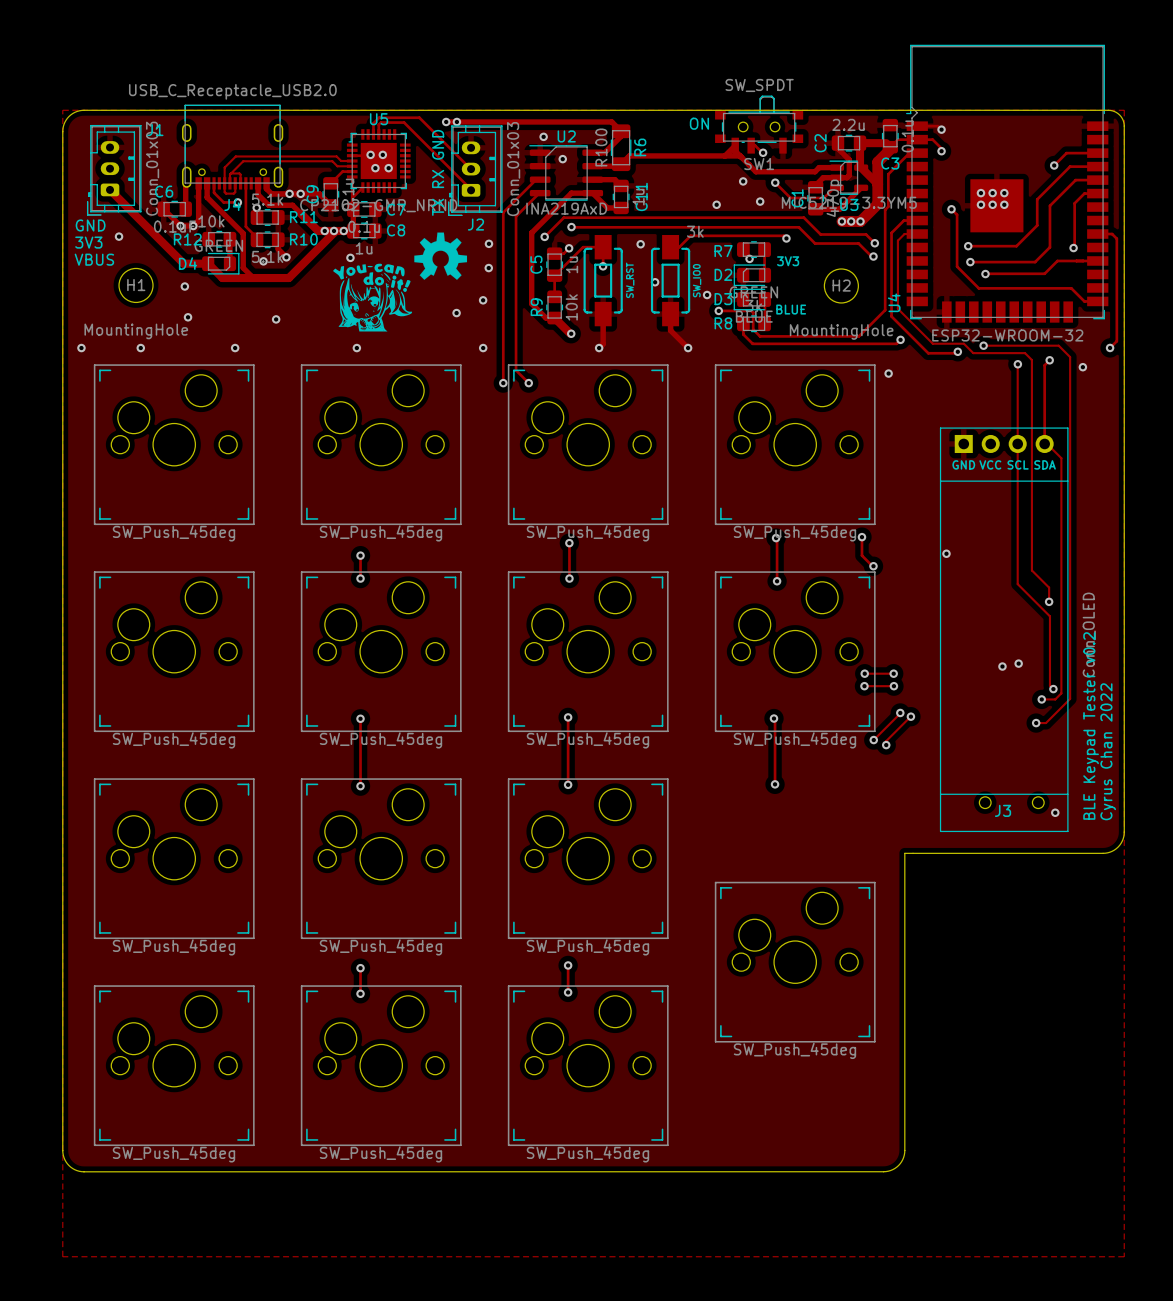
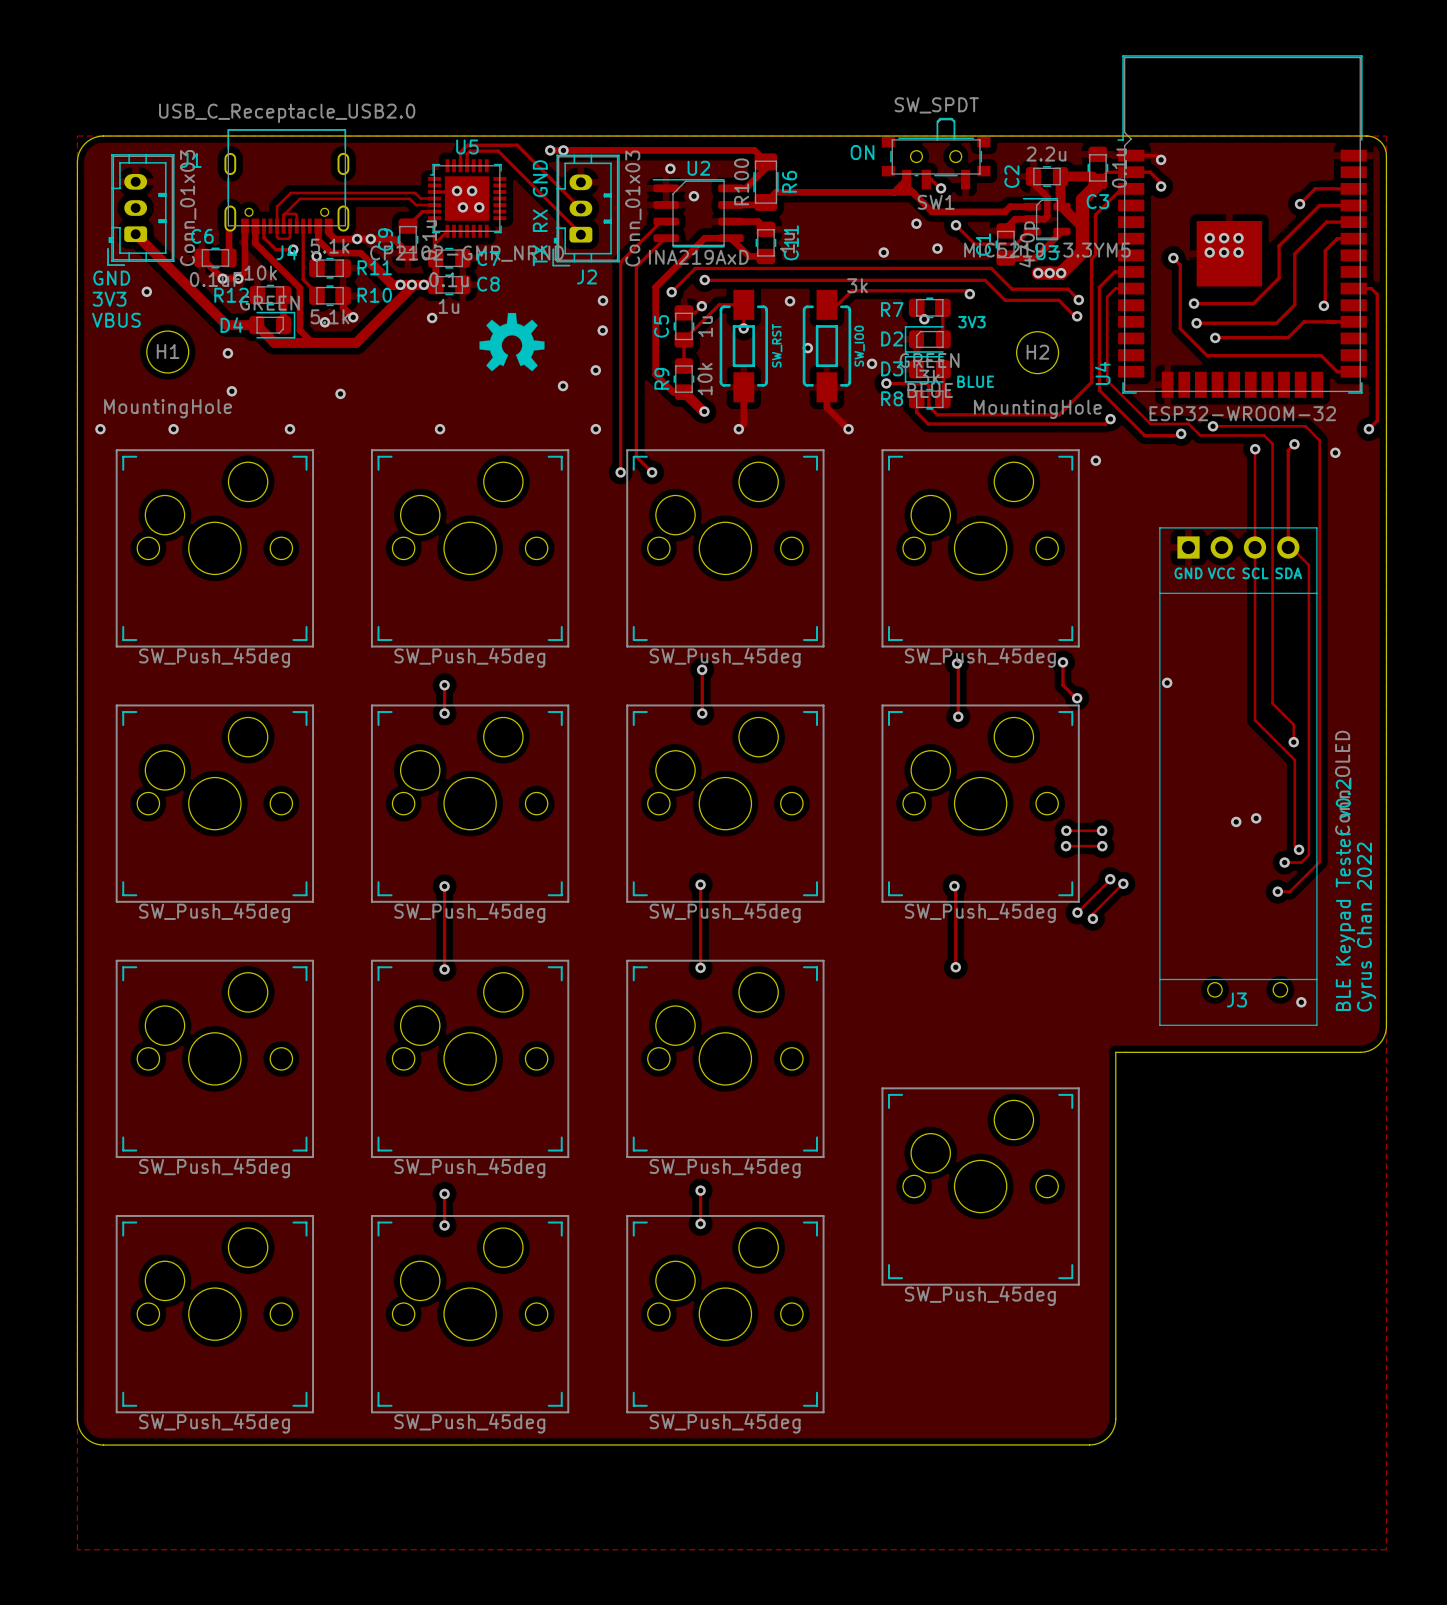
drawing position: (440, 256) -> (512, 342)
drawing: [333, 263, 413, 332] -> none

